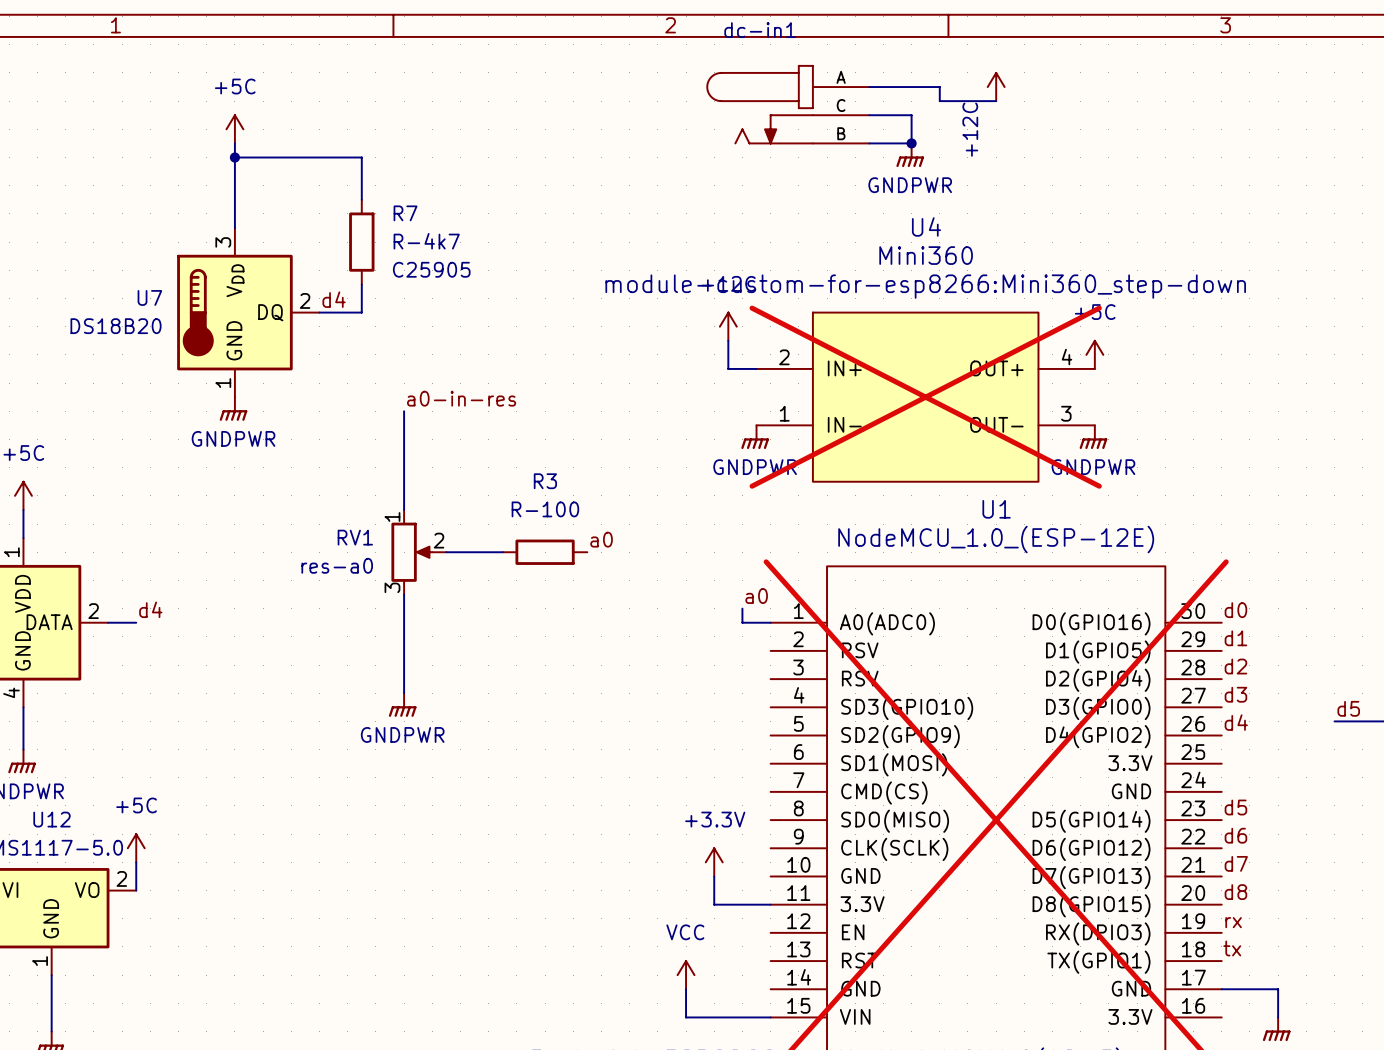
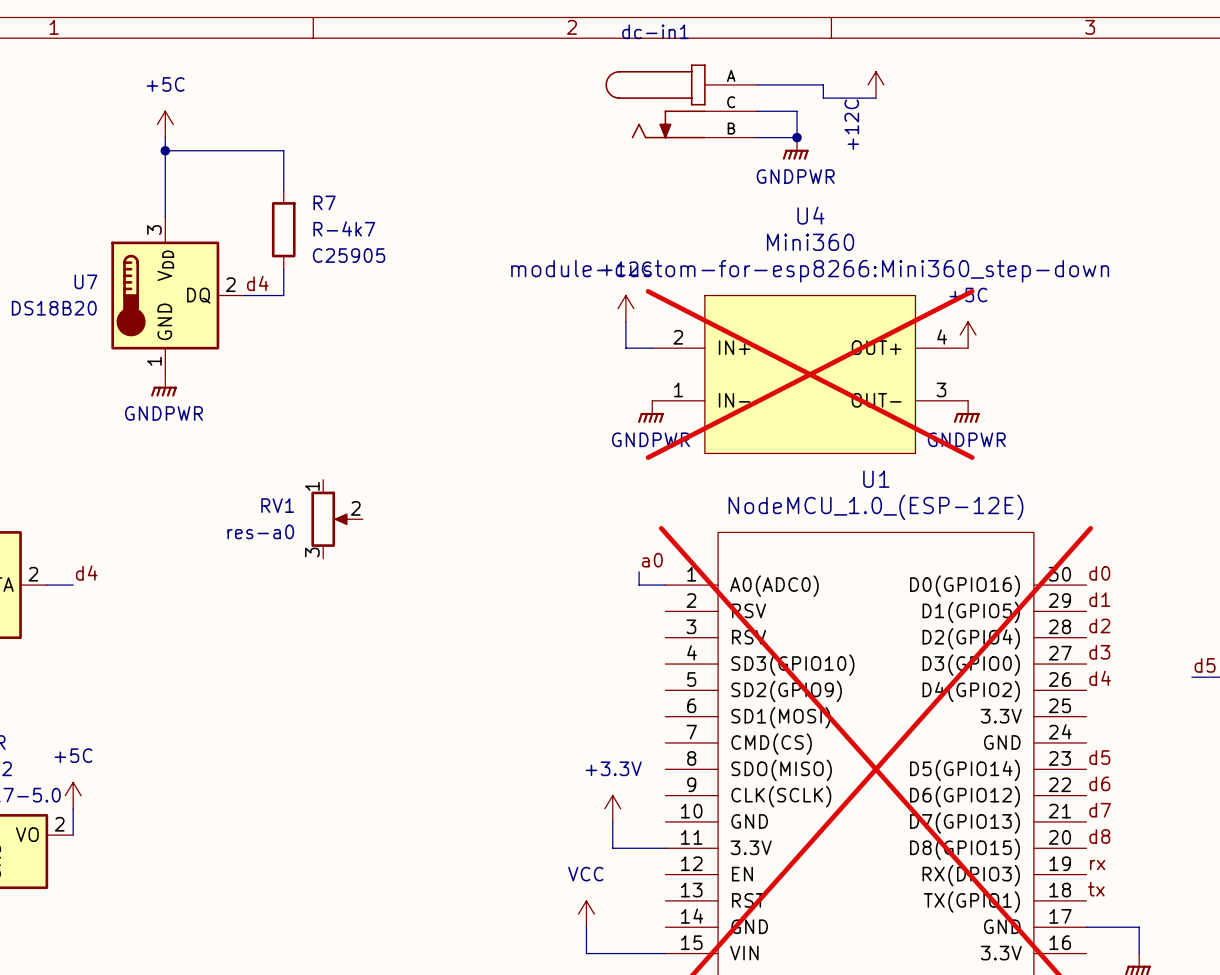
label: a0-in-res (461, 398) -> none
wire: (404, 411) (404, 509) -> none
label: a0 (601, 539) -> none
wire: (446, 552) (502, 552) -> none
R3: R-100 (545, 552) -> none
wire: (404, 594) (404, 693) -> none
power symbol: GNDPWR (402, 705) -> none

